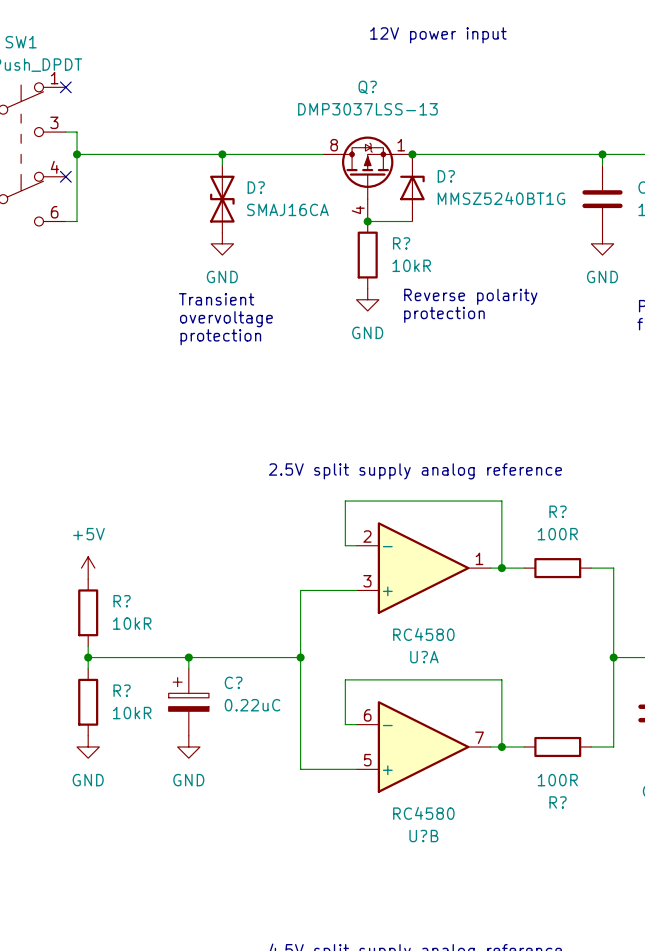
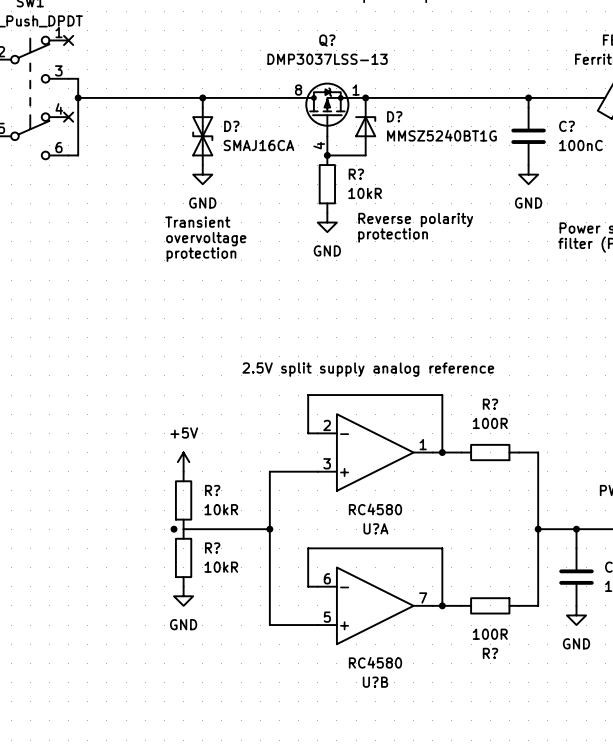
power symbol position: +5V (88, 568) -> +5V (183, 462)
R?: 10kR (88, 612) -> none
R?: none -> 10kR (183, 500)
wire: (88, 646) (88, 668) -> none
wire: (88, 657) (199, 657) -> none
junction: (88, 657) -> none
wire: (188, 657) (188, 668) -> none
R?: none -> 10kR (183, 557)
R?: 10kR (88, 702) -> none
C?: 0.22uC (188, 702) -> none
power symbol: GND (88, 746) -> none
power symbol position: GND (188, 746) -> GND (183, 596)

